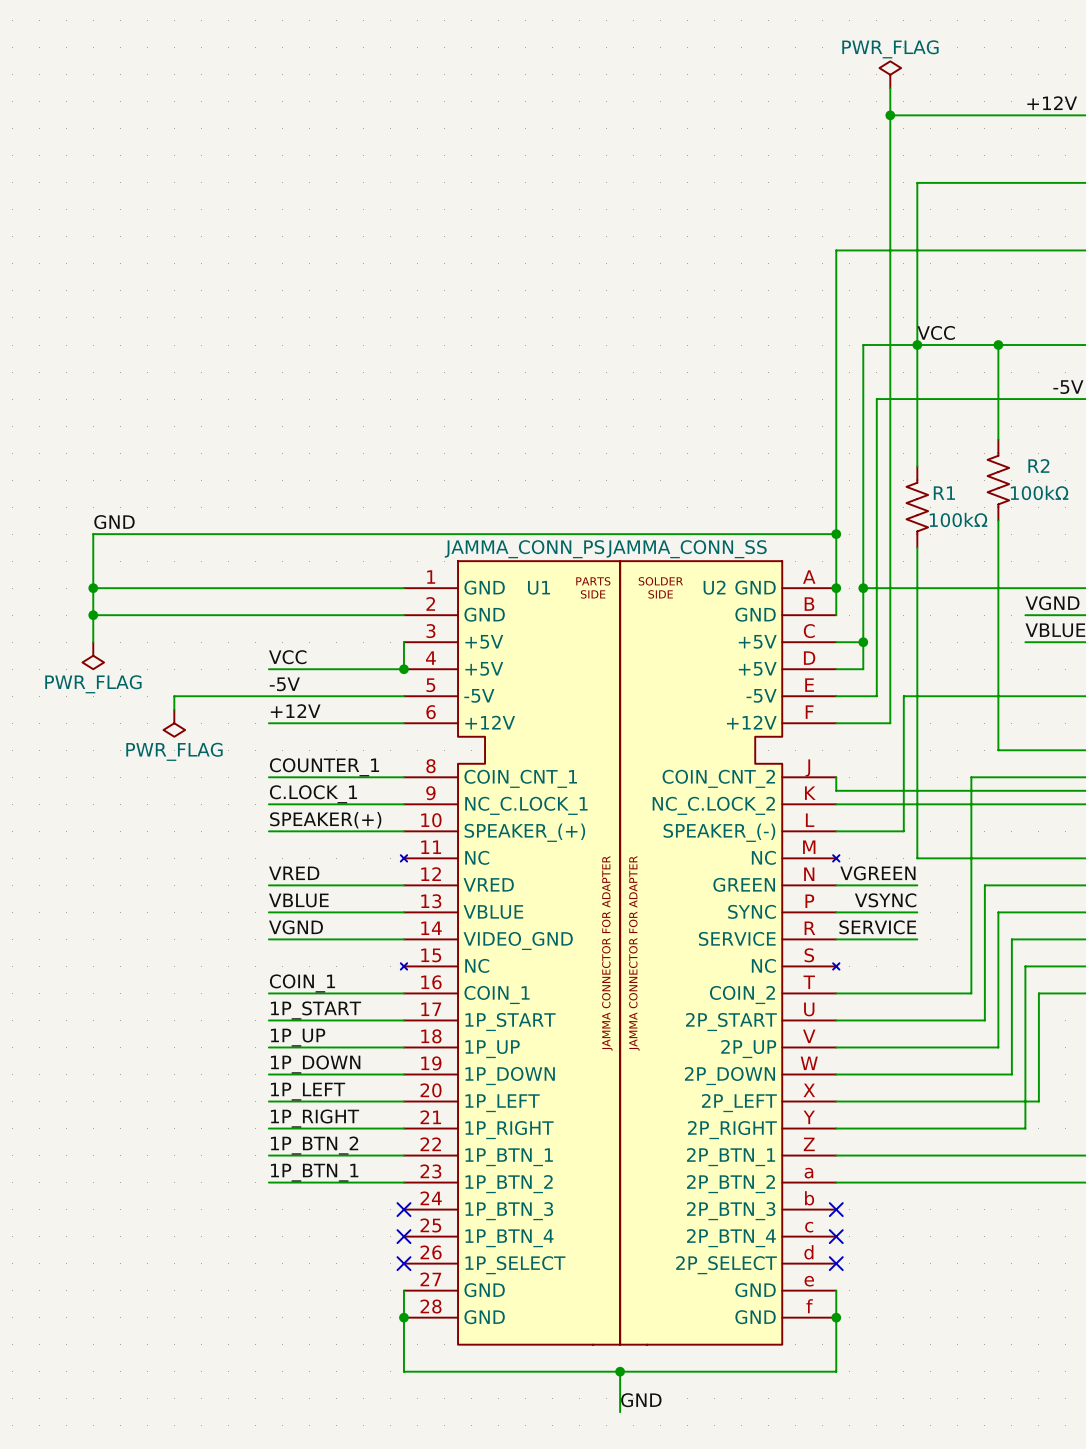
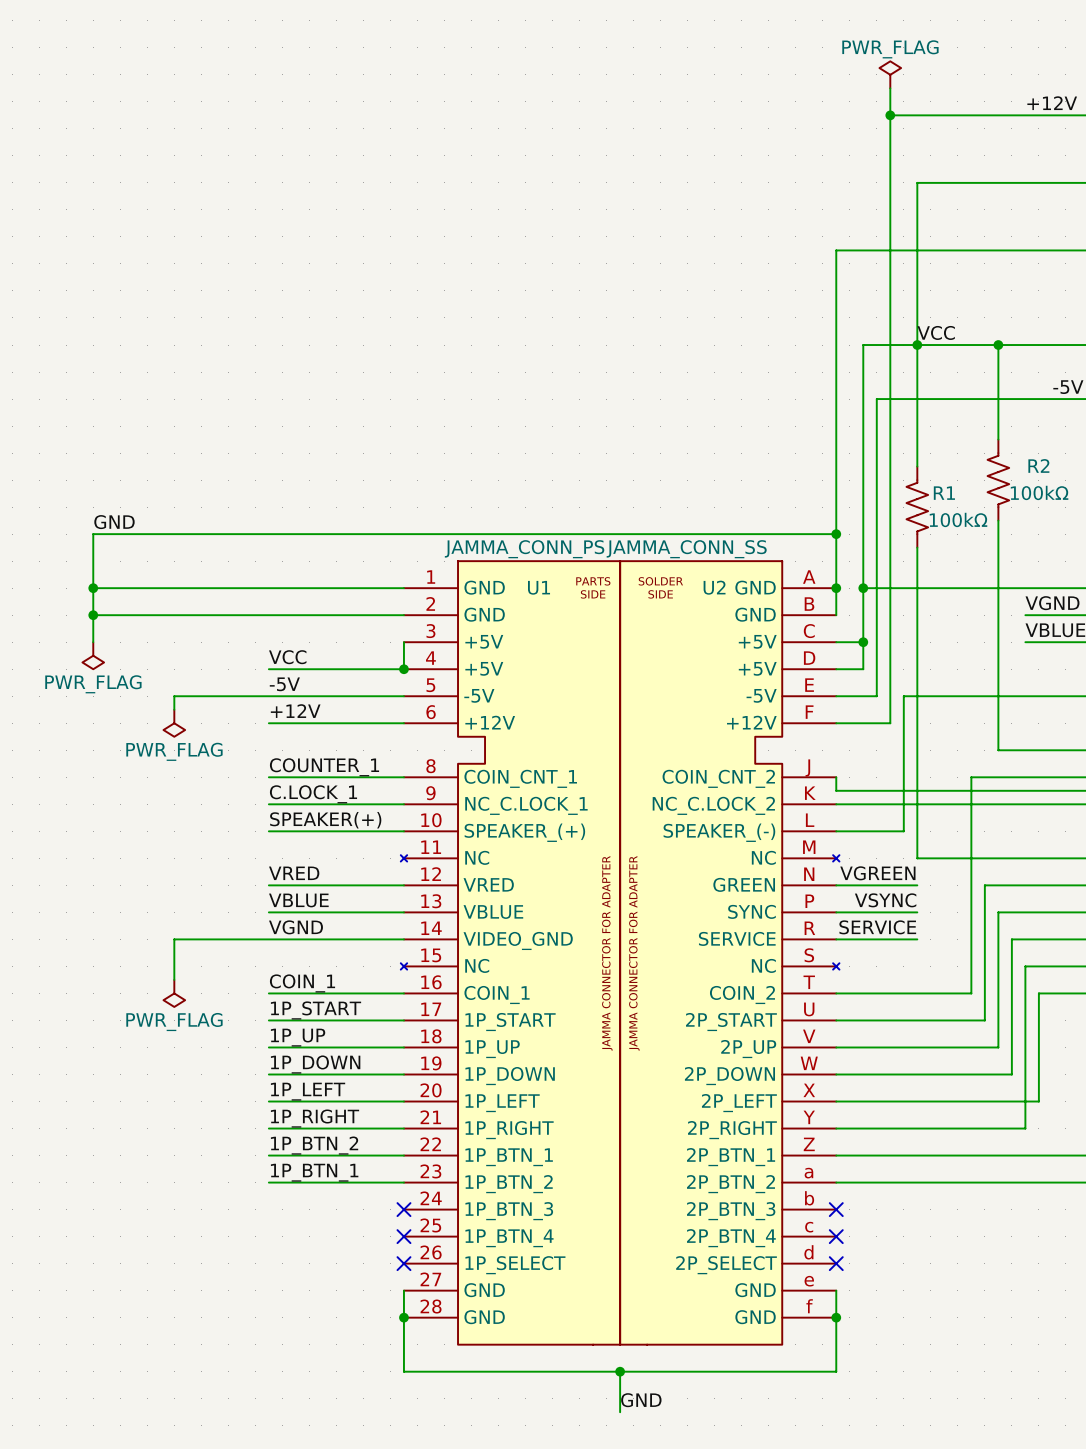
wire: none -> (268, 939) (174, 939) (174, 979)
power symbol: none -> PWR_FLAG (174, 993)

